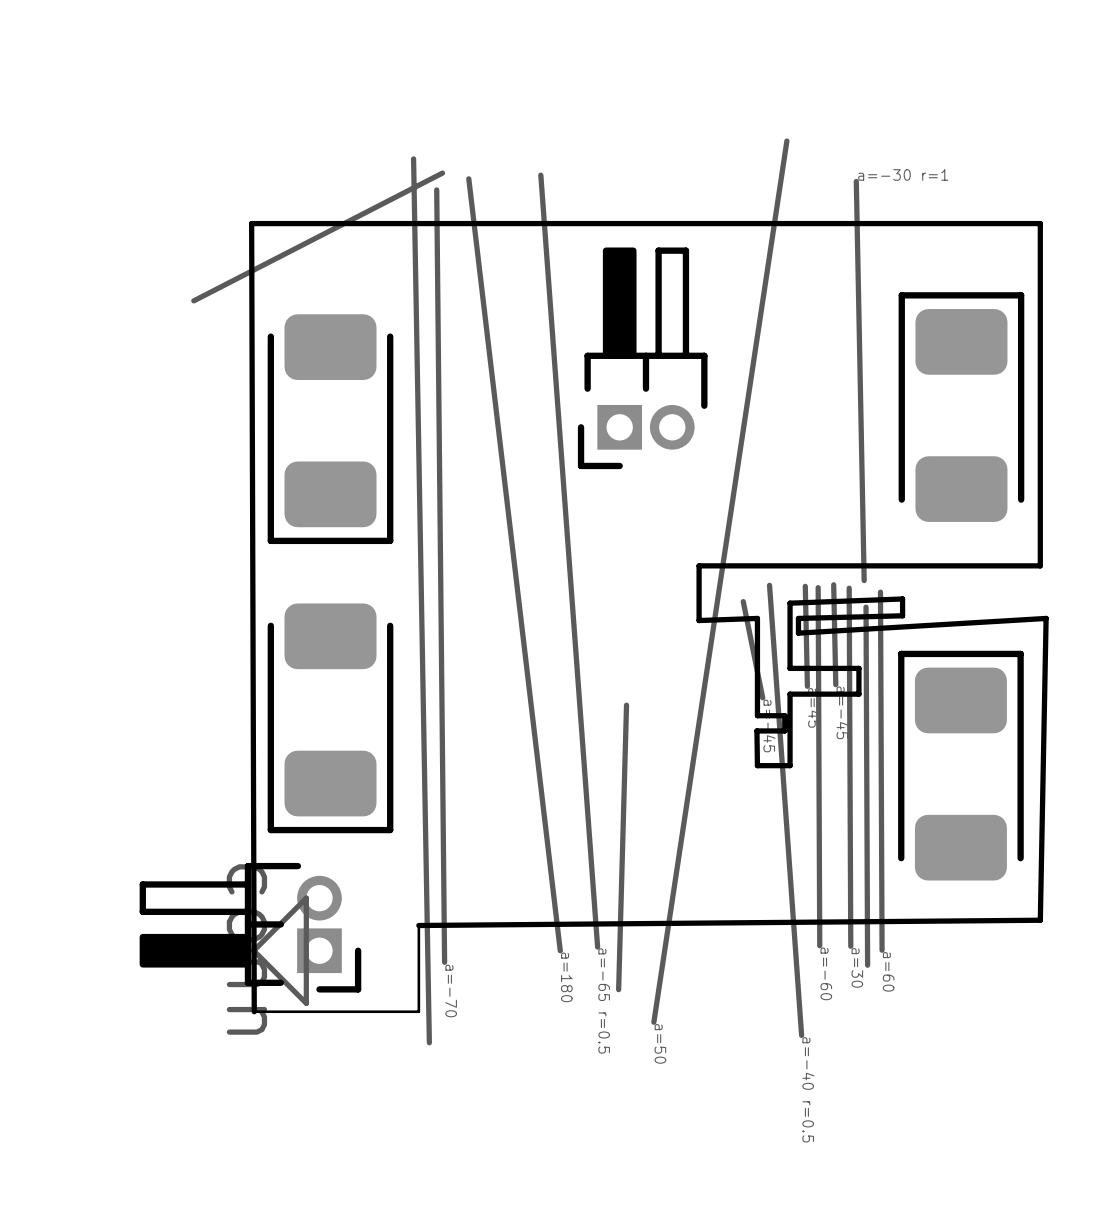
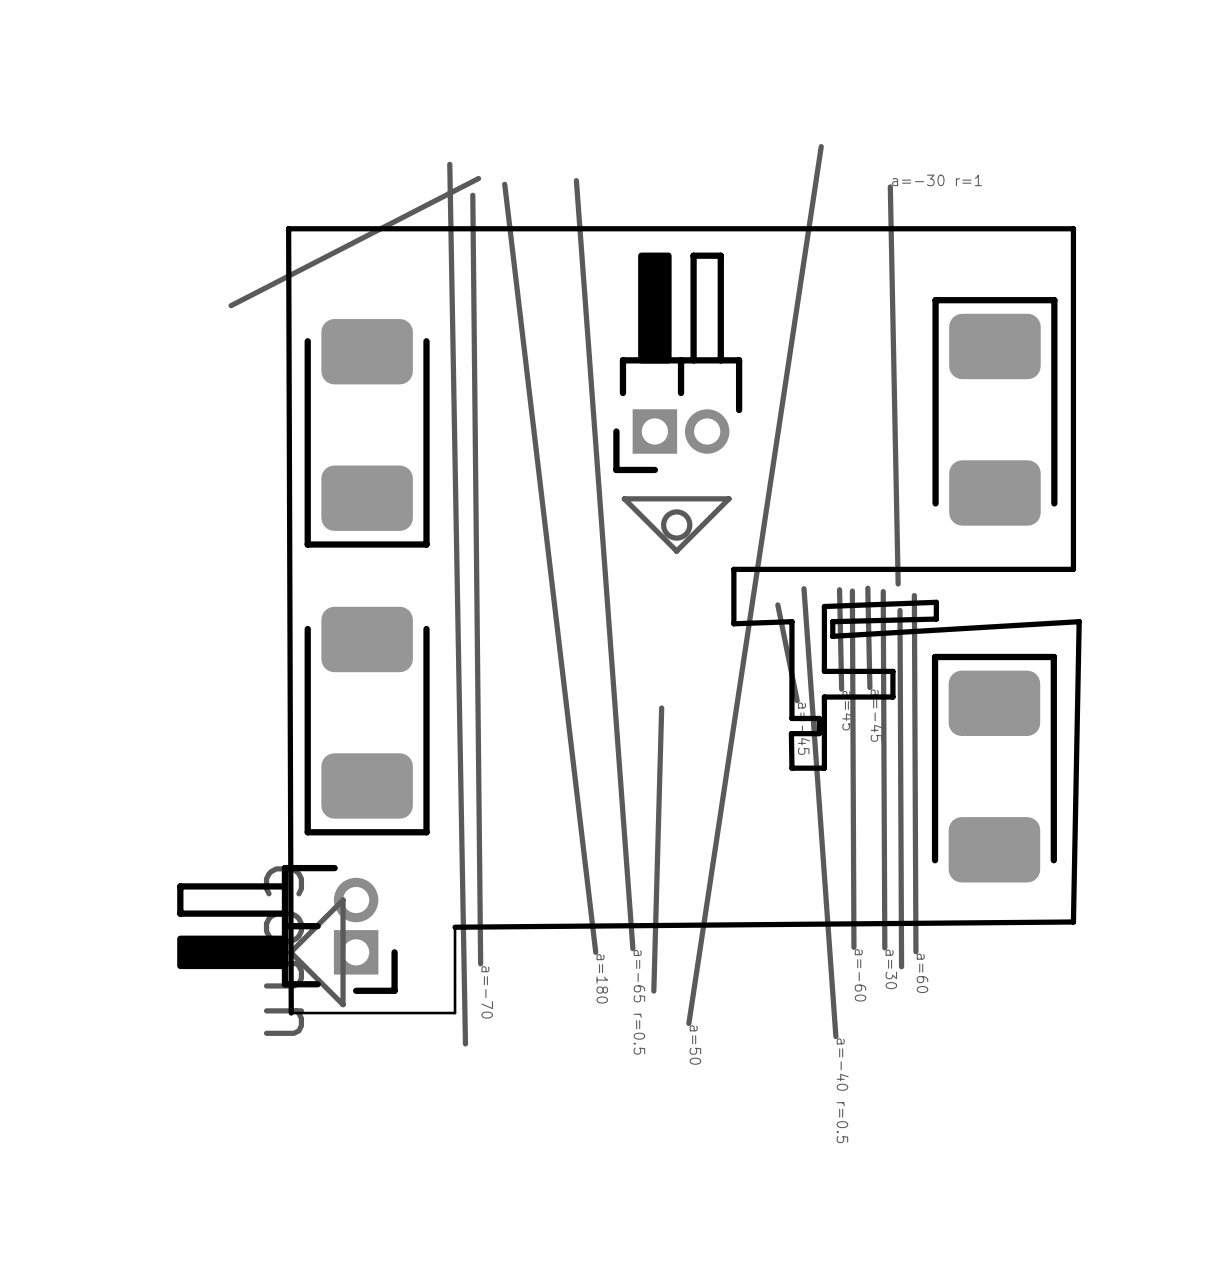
drawing: none -> [621, 496, 732, 554]

